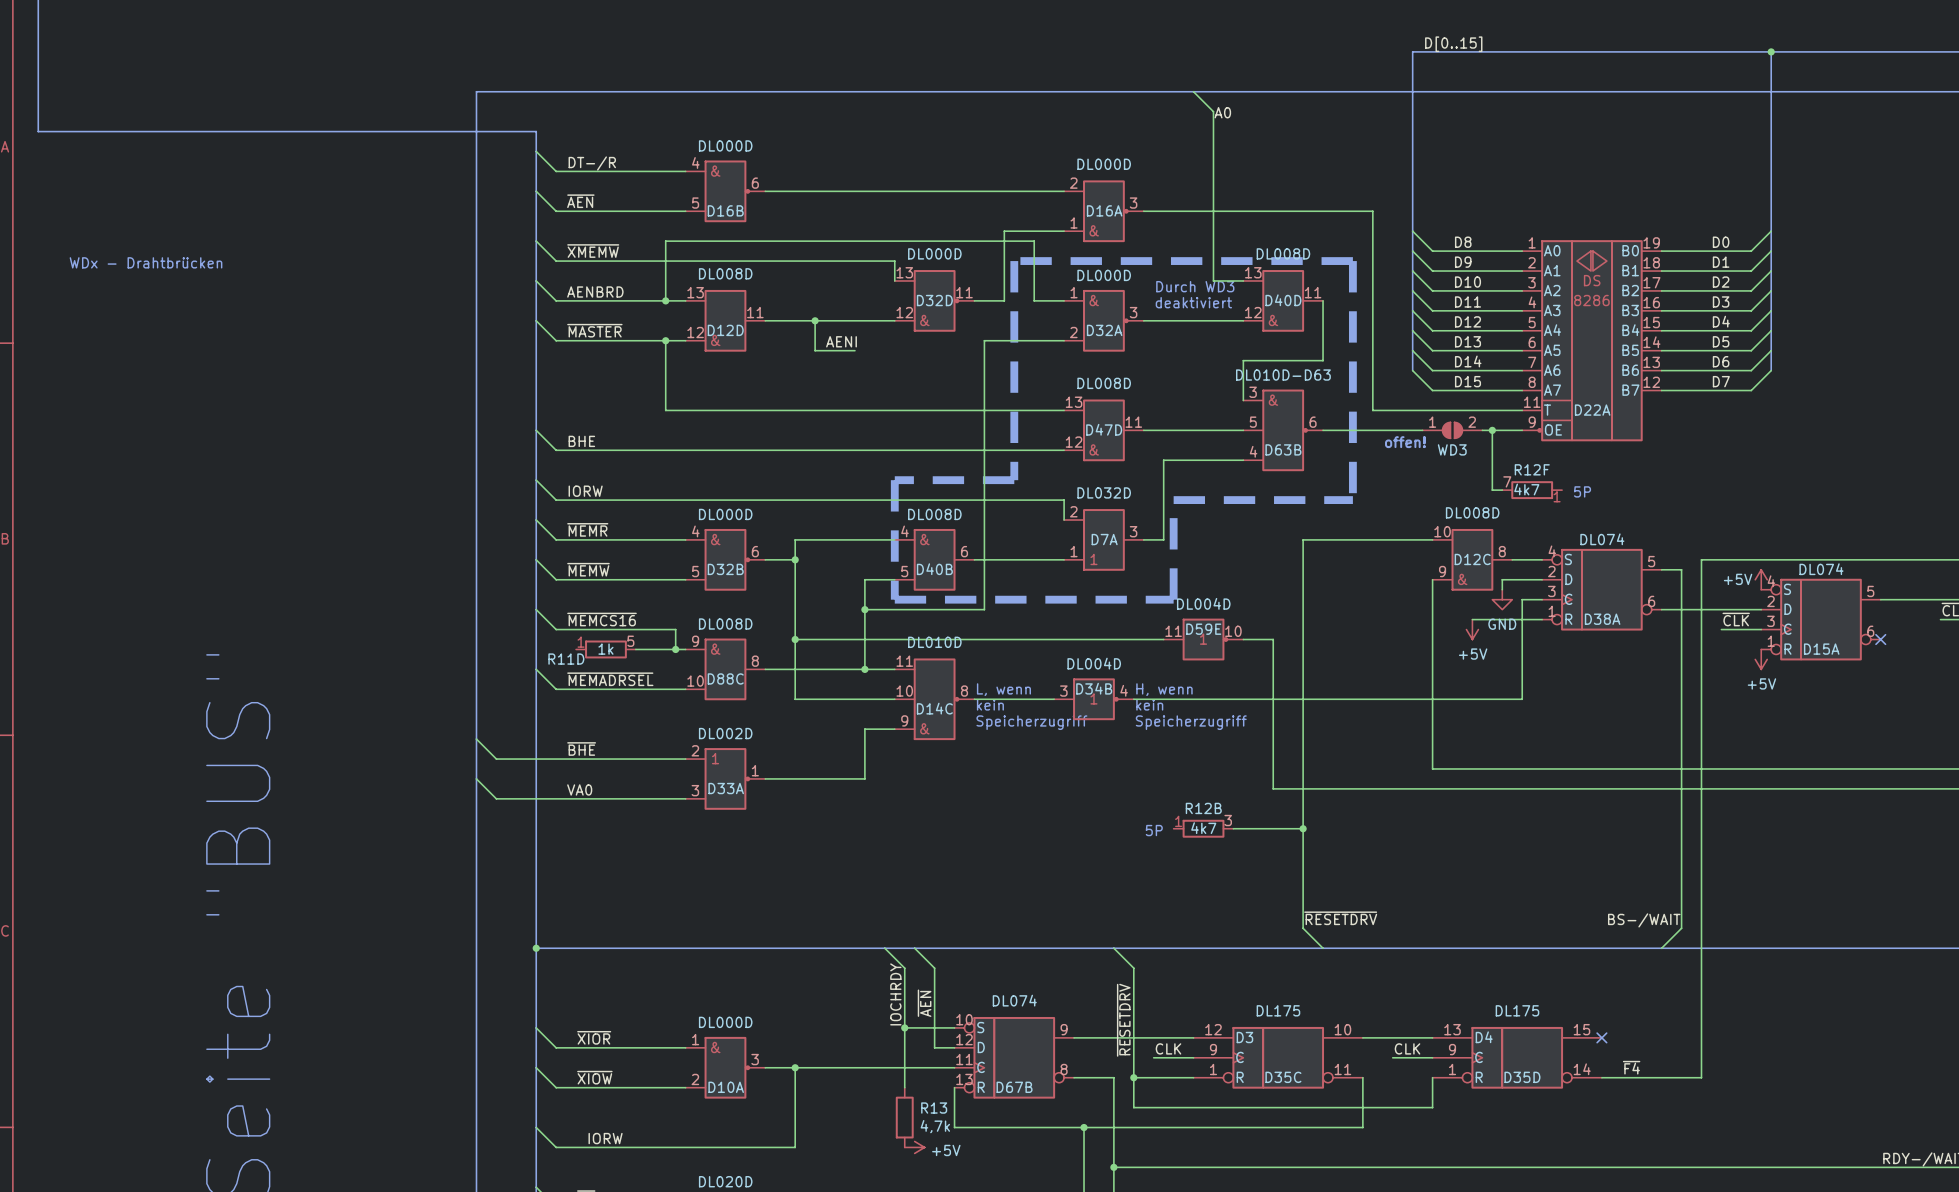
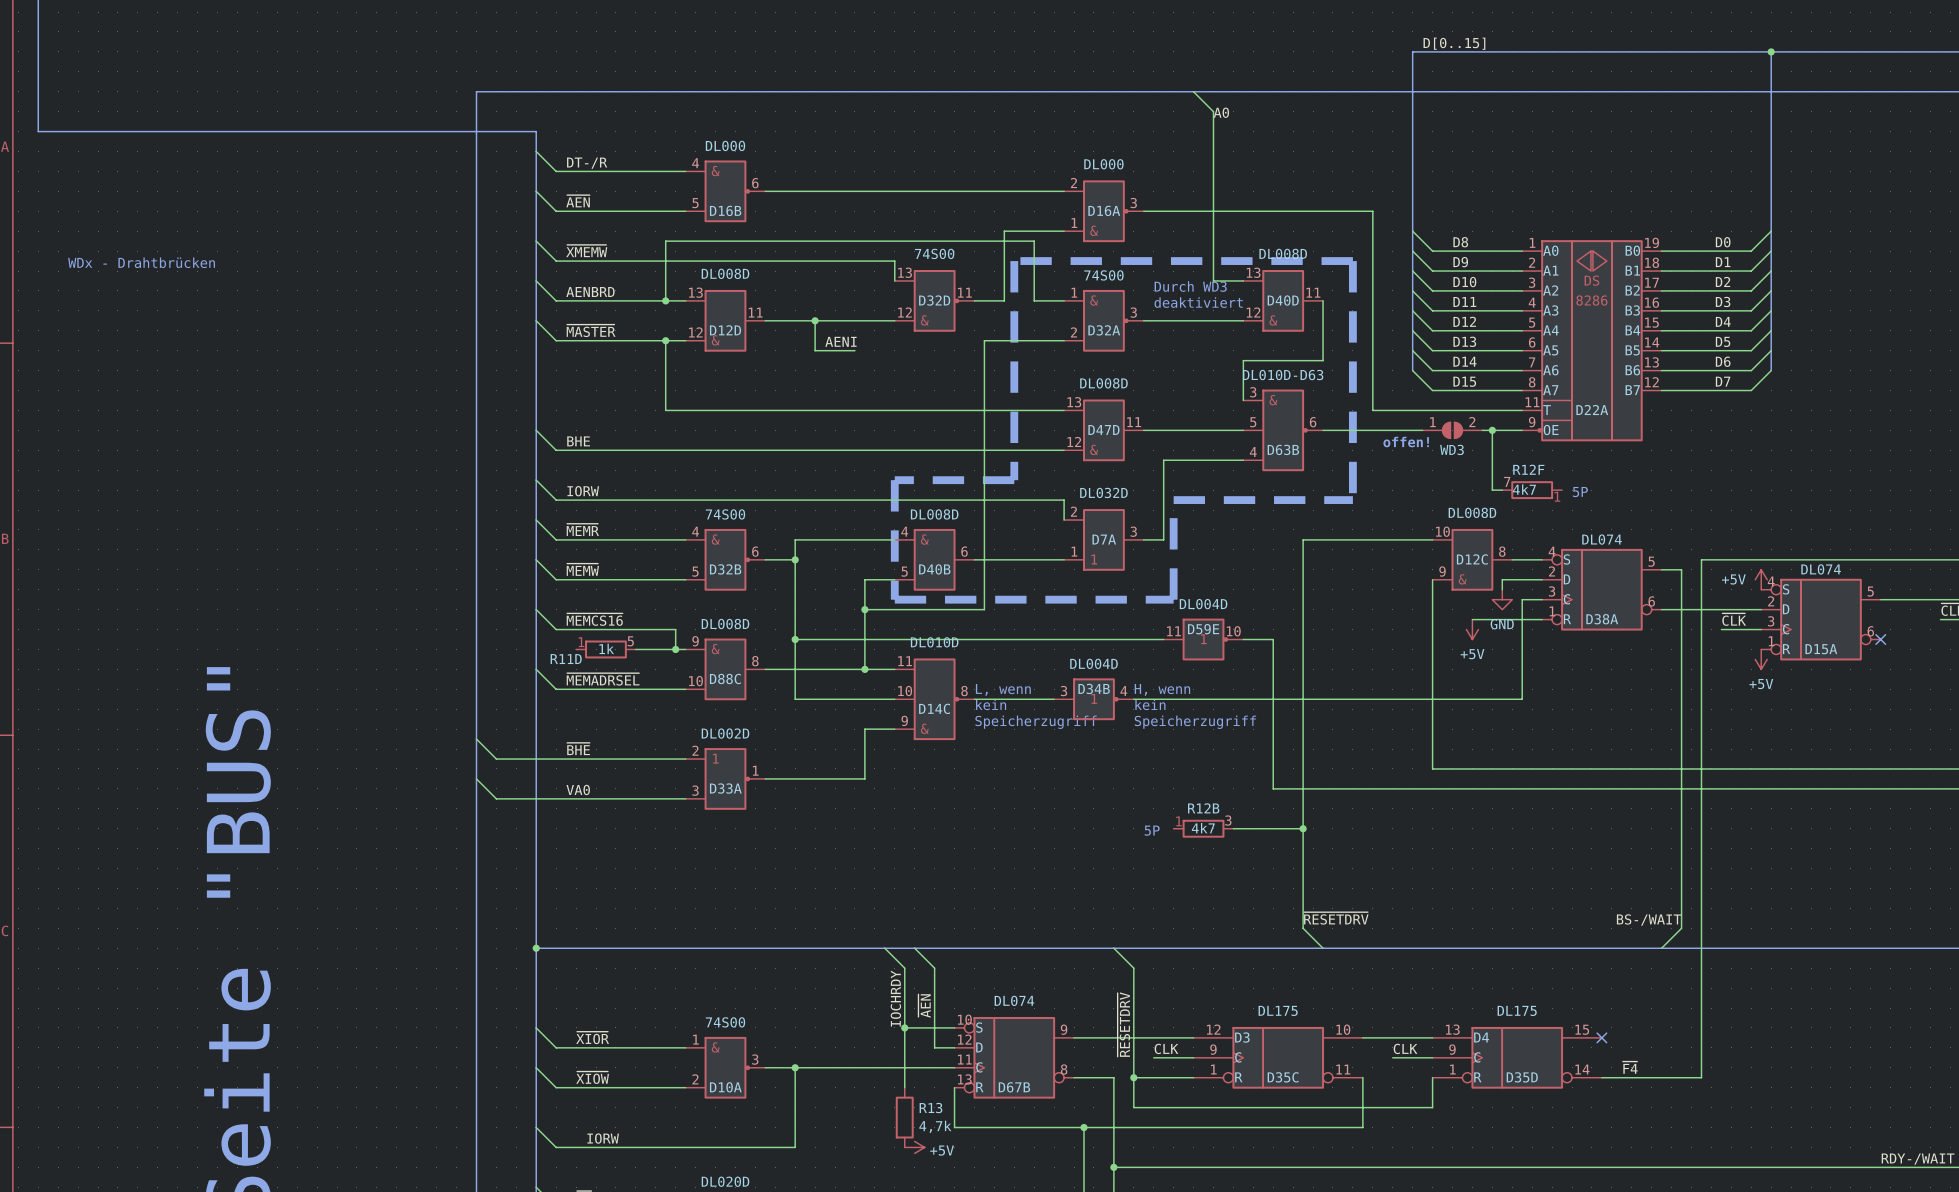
D16B value: DL000D (725, 145) -> DL000 (725, 145)
D16A value: DL000D (1104, 164) -> DL000 (1103, 164)
D32D value: DL000D (934, 253) -> 74S00 (934, 253)
D32A value: DL000D (1104, 275) -> 74S00 (1103, 275)
D32B value: DL000D (725, 514) -> 74S00 (725, 514)
D10A value: DL000D (725, 1022) -> 74S00 (725, 1022)

